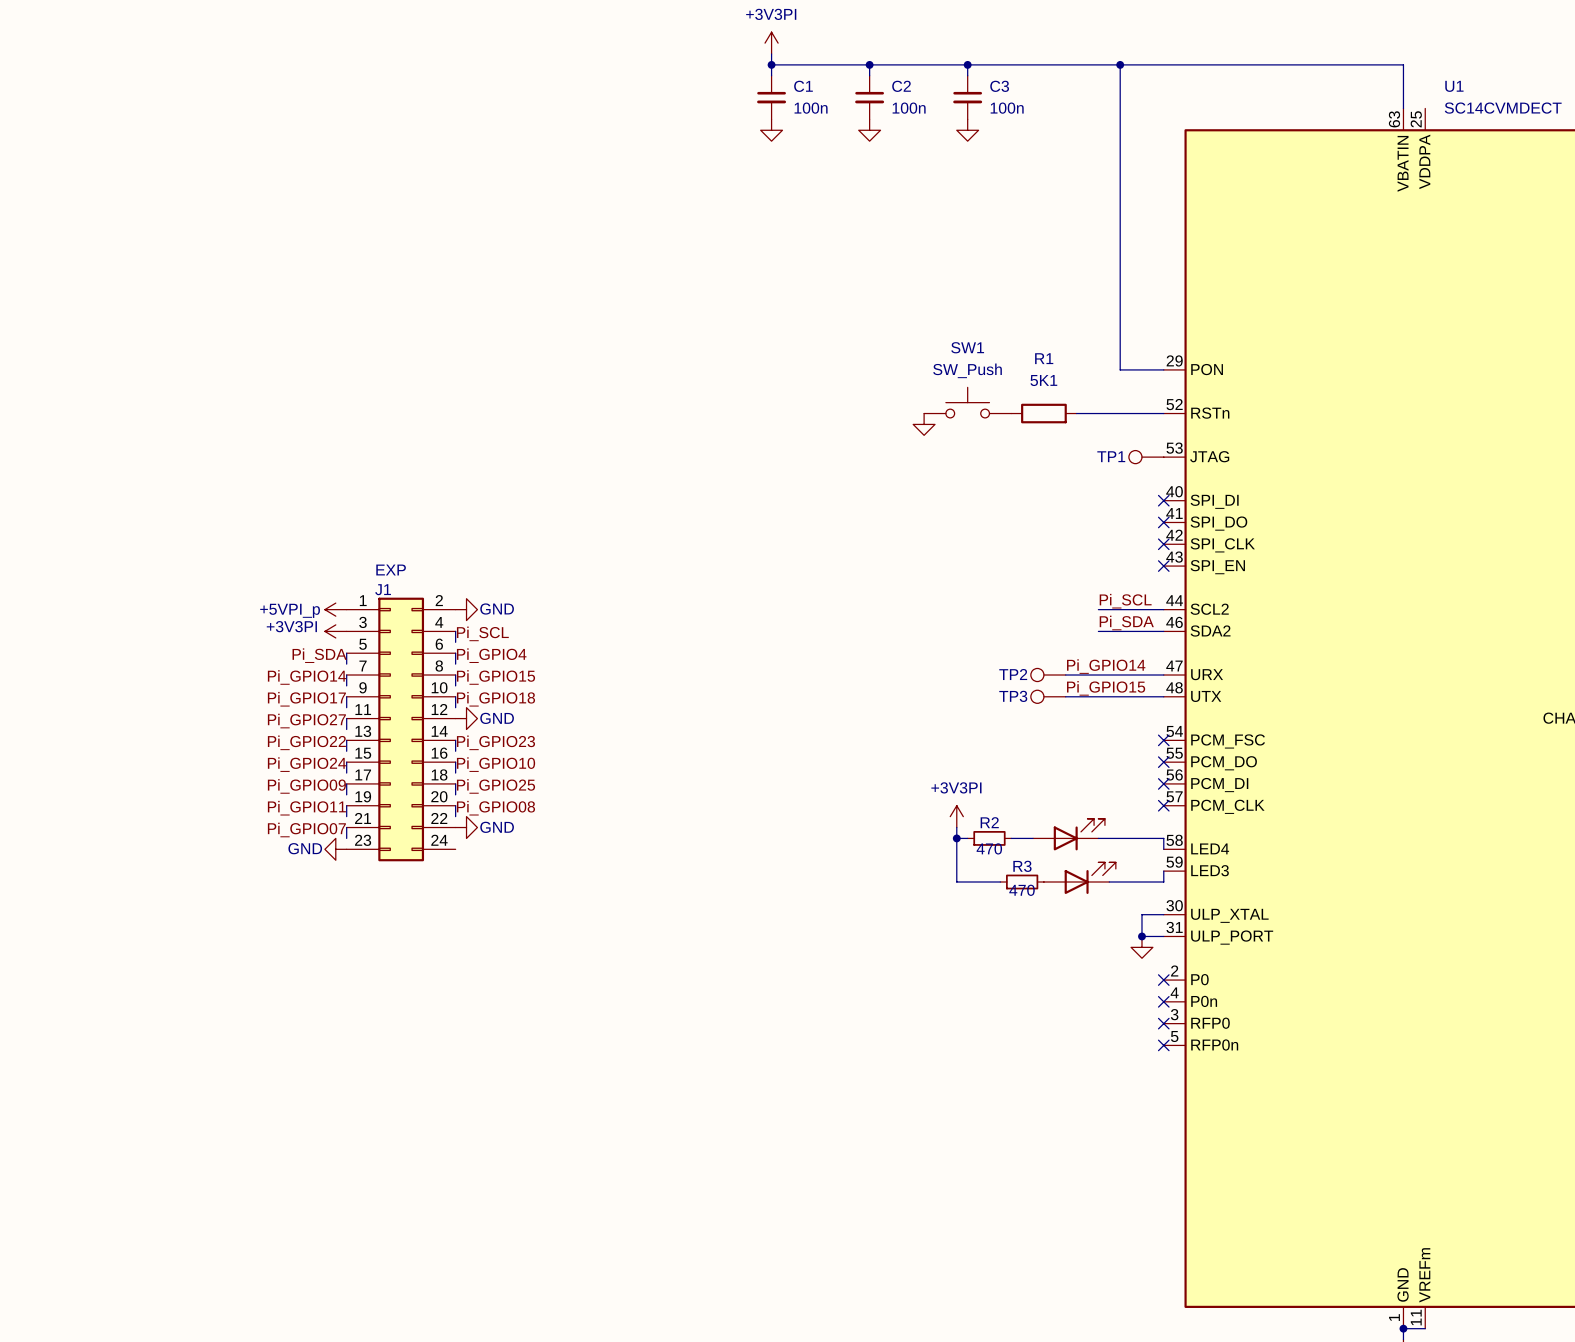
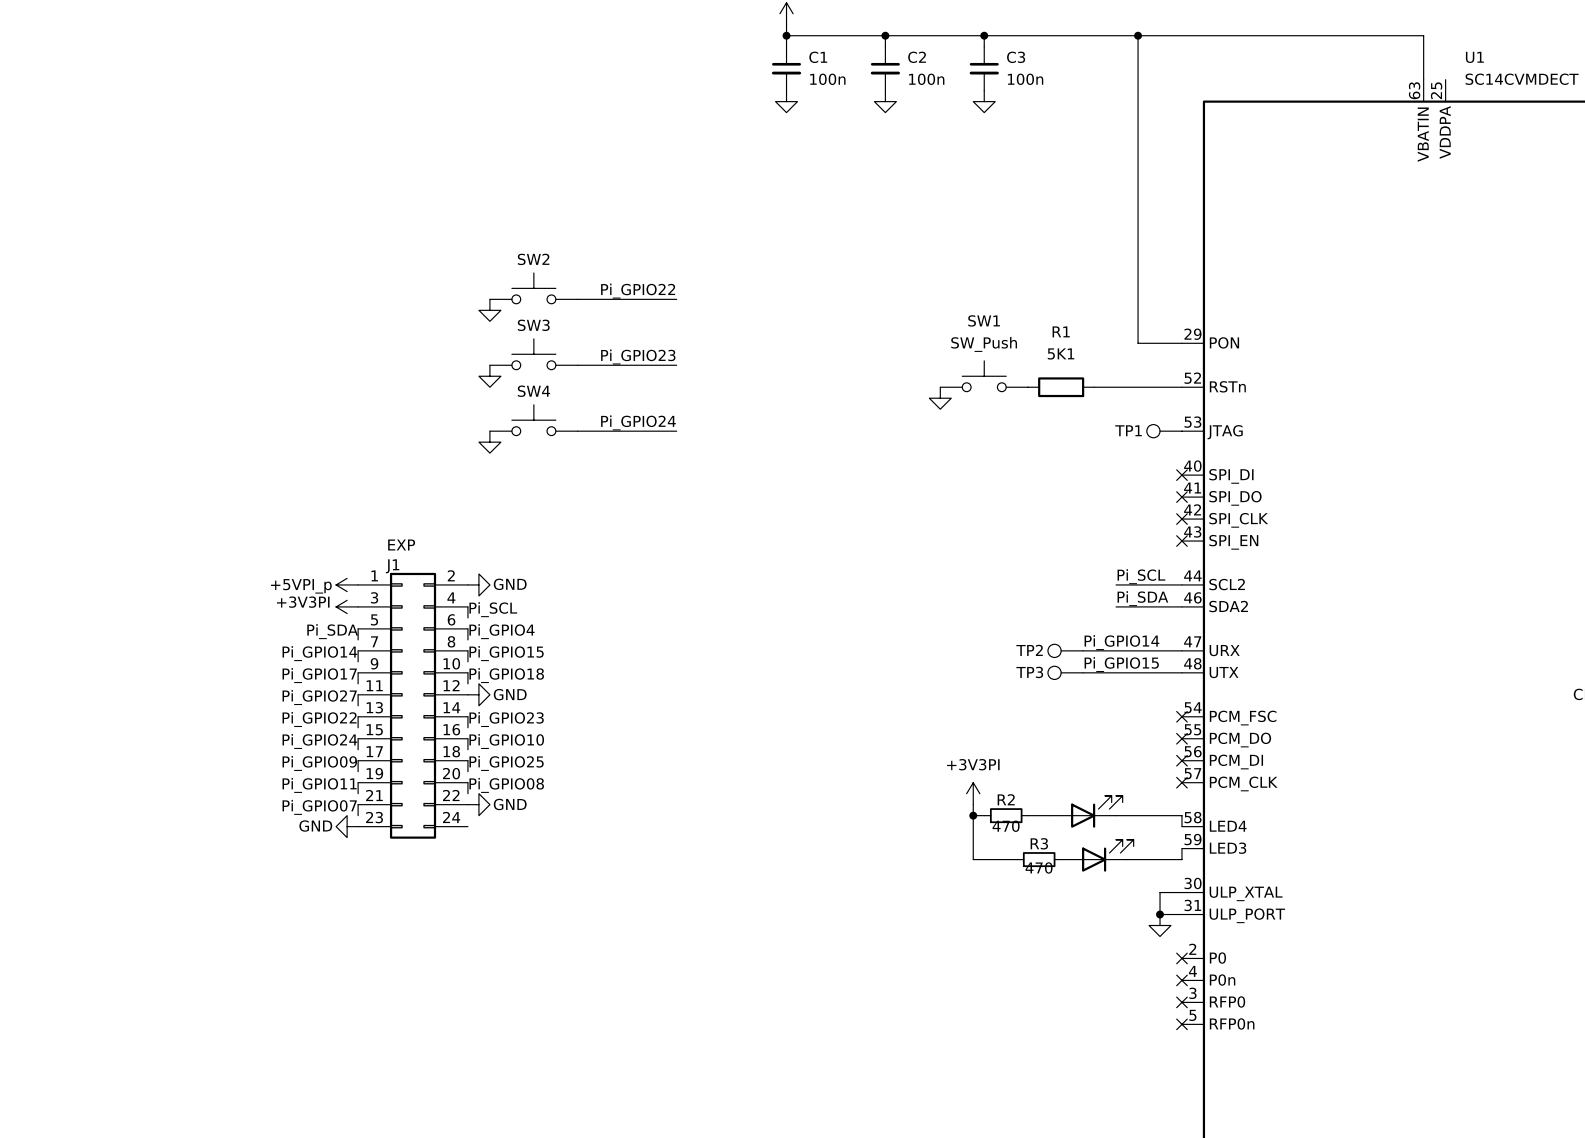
SW2: none -> (533, 288)
label: none -> Pi_GPIO22 (638, 291)
wire: none -> (577, 299) (676, 299)
power symbol: none -> (489, 310)
SW3: none -> (533, 354)
label: none -> Pi_GPIO23 (638, 357)
wire: none -> (577, 365) (676, 365)
power symbol: none -> (489, 376)
SW4: none -> (533, 420)
label: none -> Pi_GPIO24 (638, 422)
wire: none -> (577, 431) (676, 431)
power symbol: none -> (489, 442)

